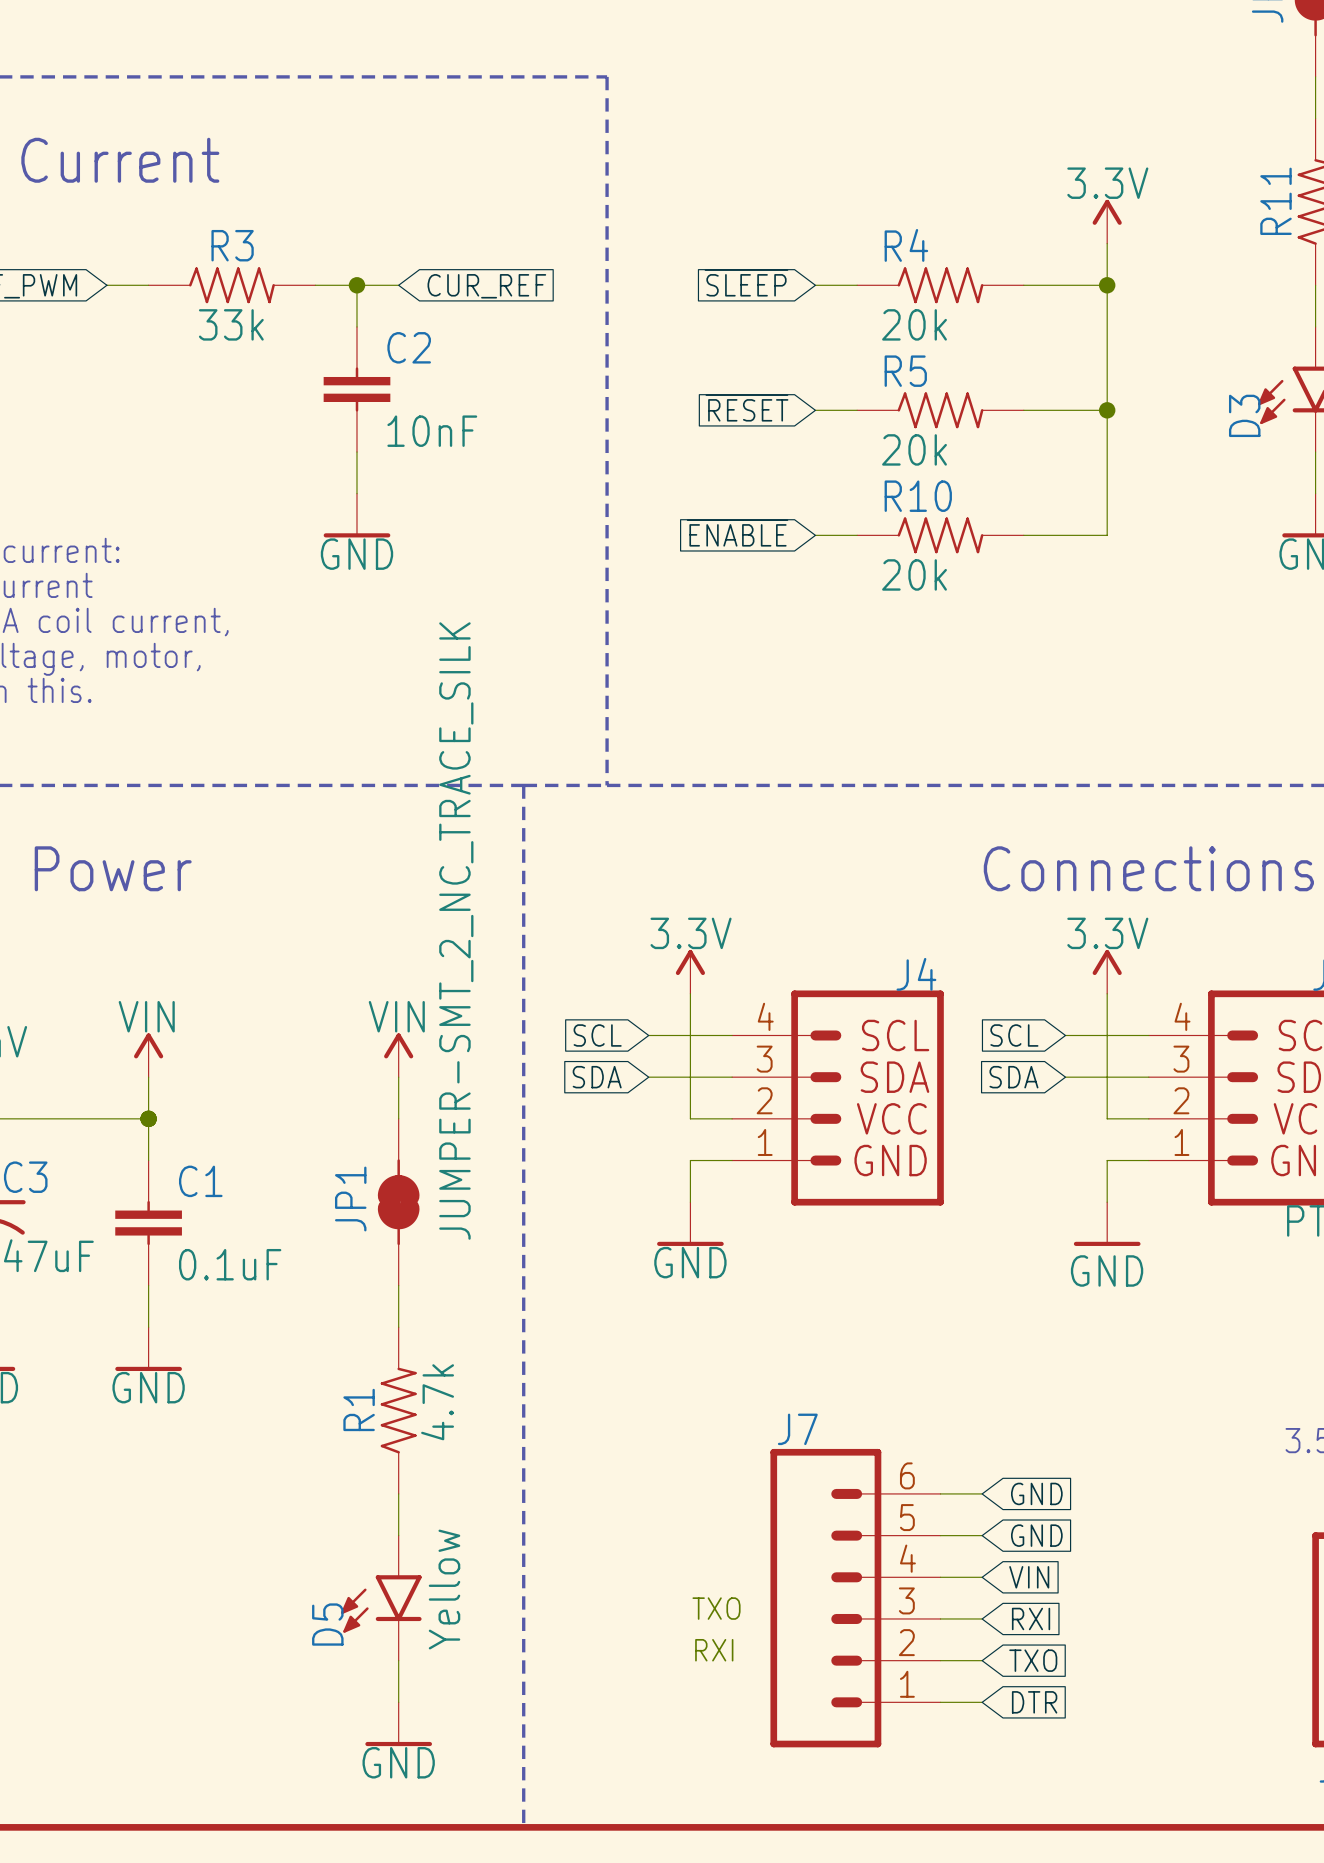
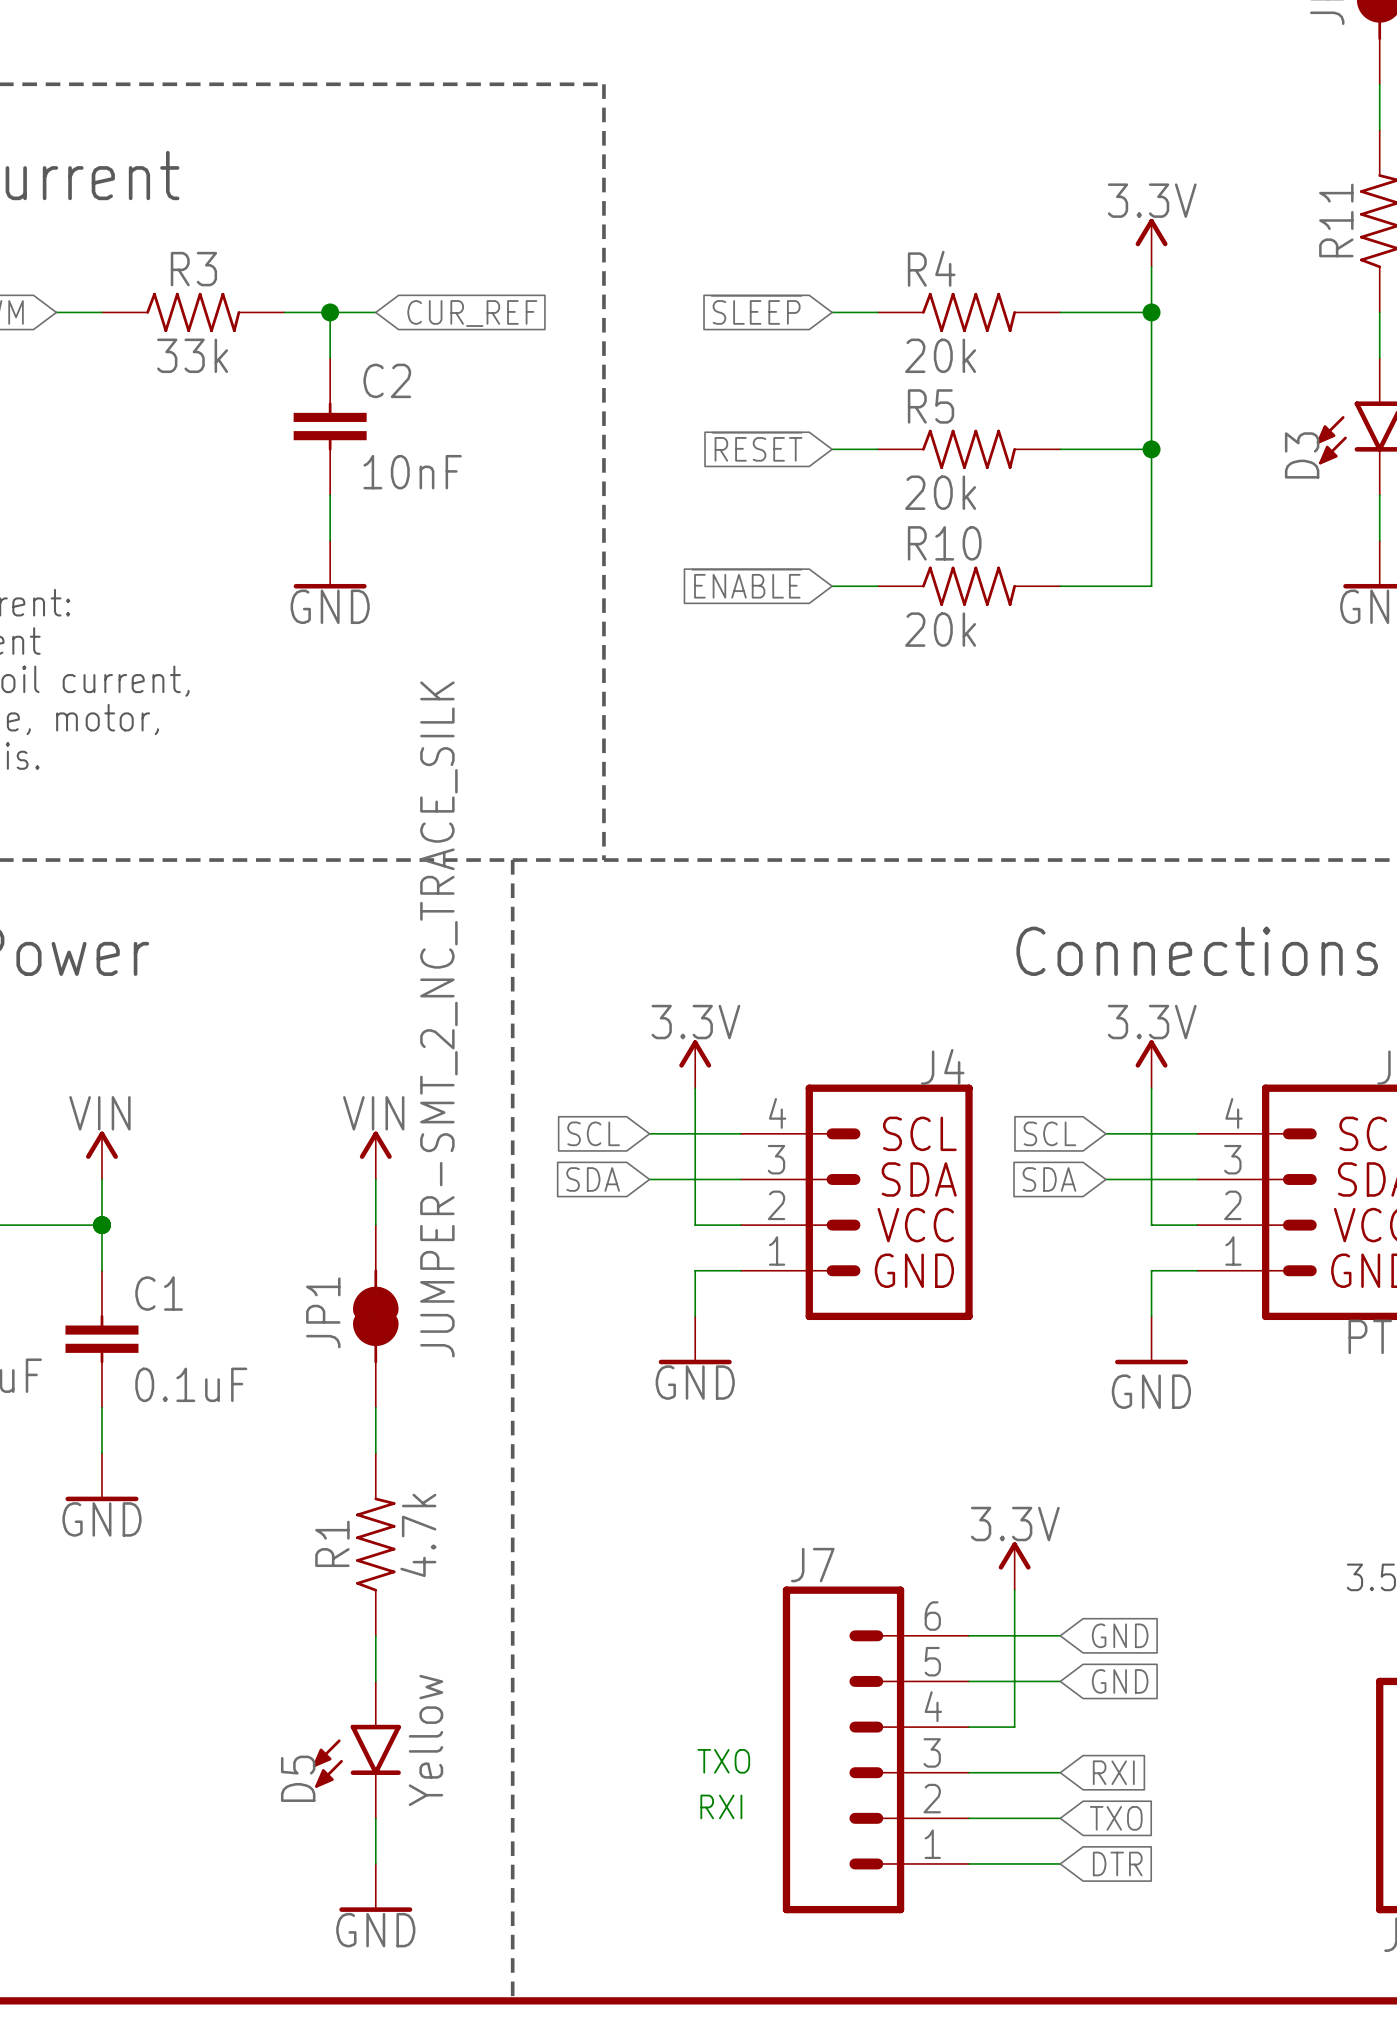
power symbol: none -> 3.3V (1014, 1566)
wire: none -> (1014, 1590) (1014, 1727)
wire: none -> (1014, 1635) (1060, 1635)
global label: GND (1036, 1493) -> none
global label: none -> GND (1120, 1635)
wire: none -> (1014, 1681) (1060, 1681)
global label: GND (1036, 1535) -> none
global label: none -> GND (1120, 1681)
global label: VIN (1029, 1577) -> none
wire: none -> (1014, 1772) (1060, 1772)
global label position: RXI (1031, 1618) -> RXI (1113, 1772)
wire: none -> (1014, 1818) (1060, 1818)
global label position: TXO (1033, 1660) -> TXO (1116, 1818)
wire: none -> (1014, 1863) (1060, 1863)
global label position: DTR (1034, 1702) -> DTR (1117, 1863)

